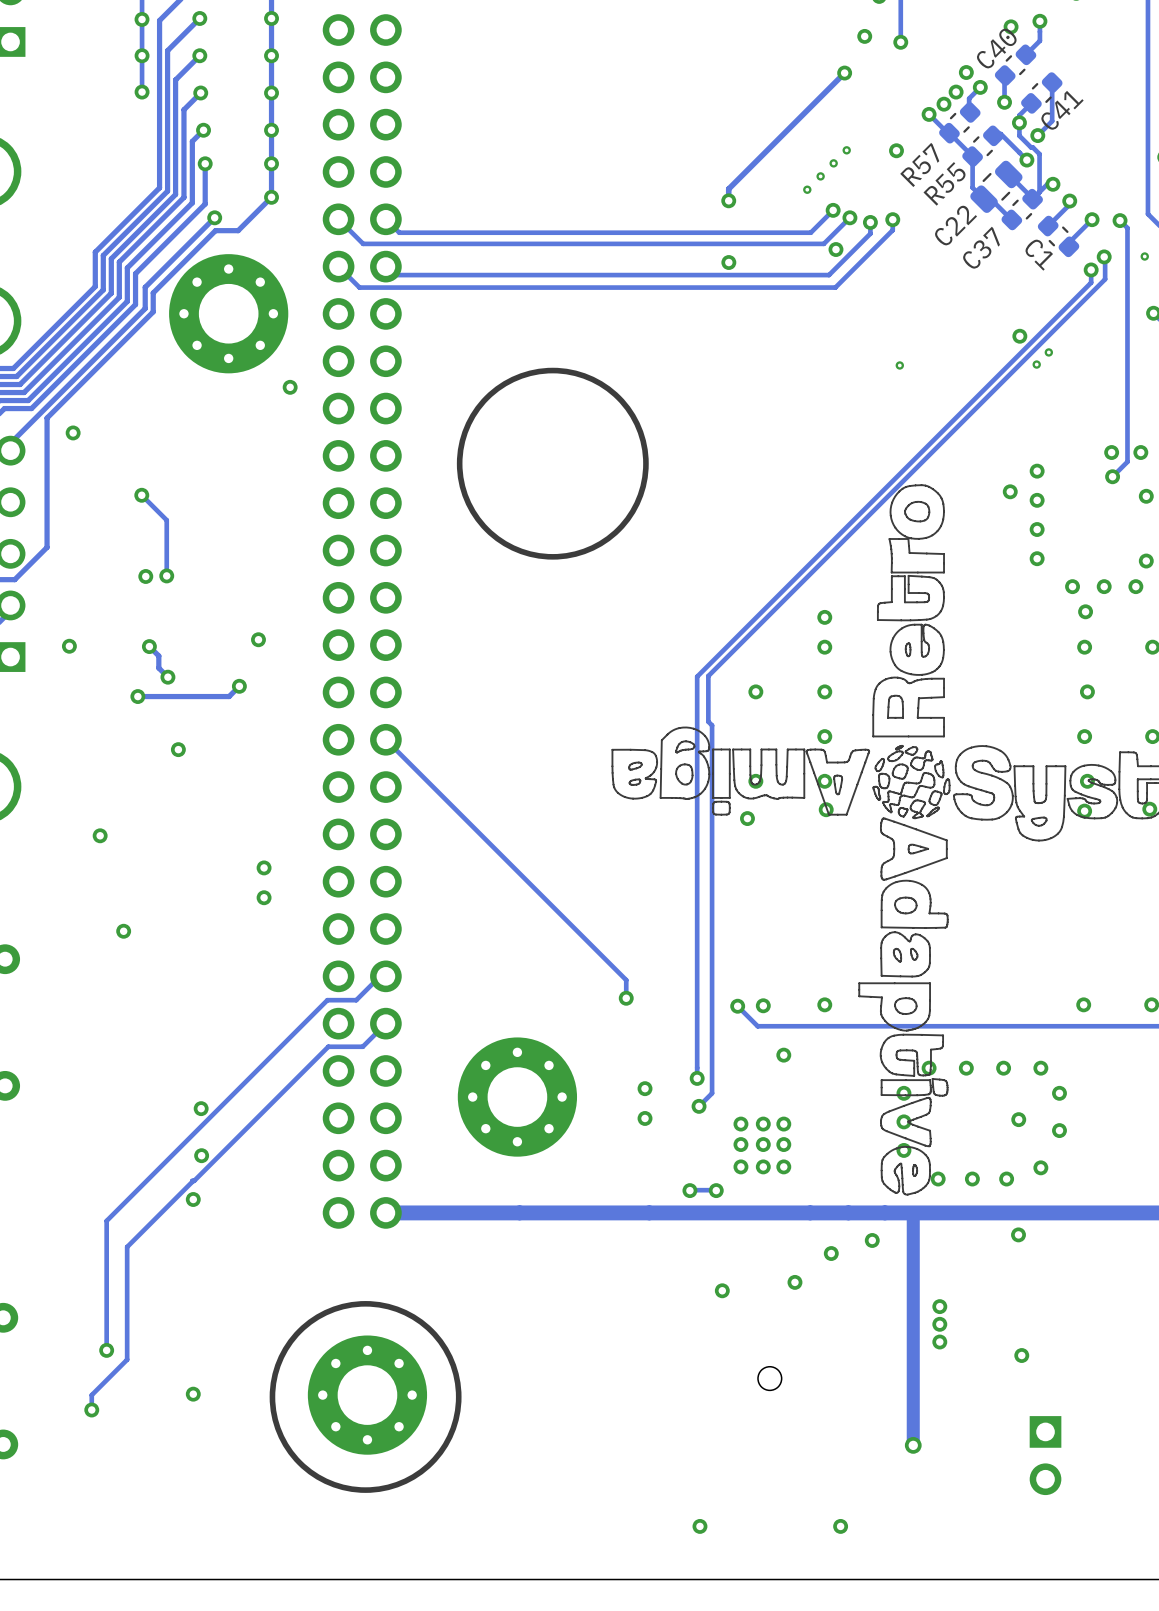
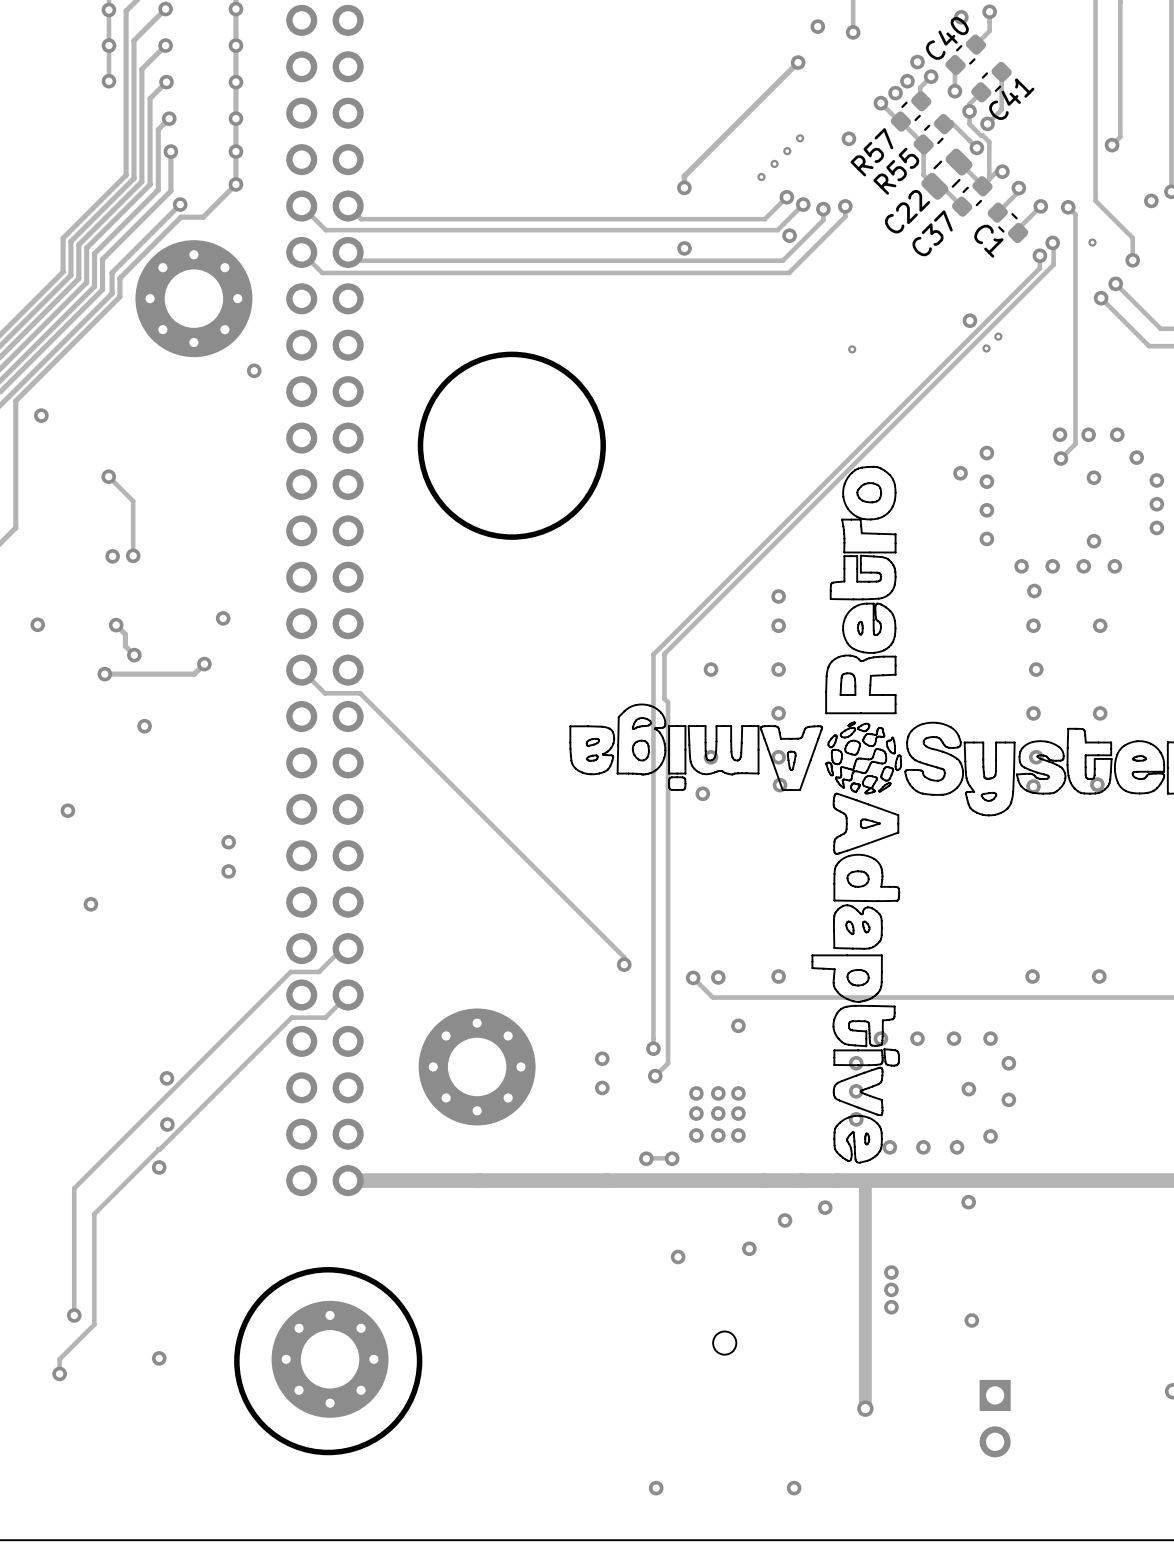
track: none -> (301, 670) (324, 693) (360, 693) (624, 957) (624, 964)
track: (385, 739) (626, 980) (626, 998) -> none
via position: (626, 998) -> (624, 964)

